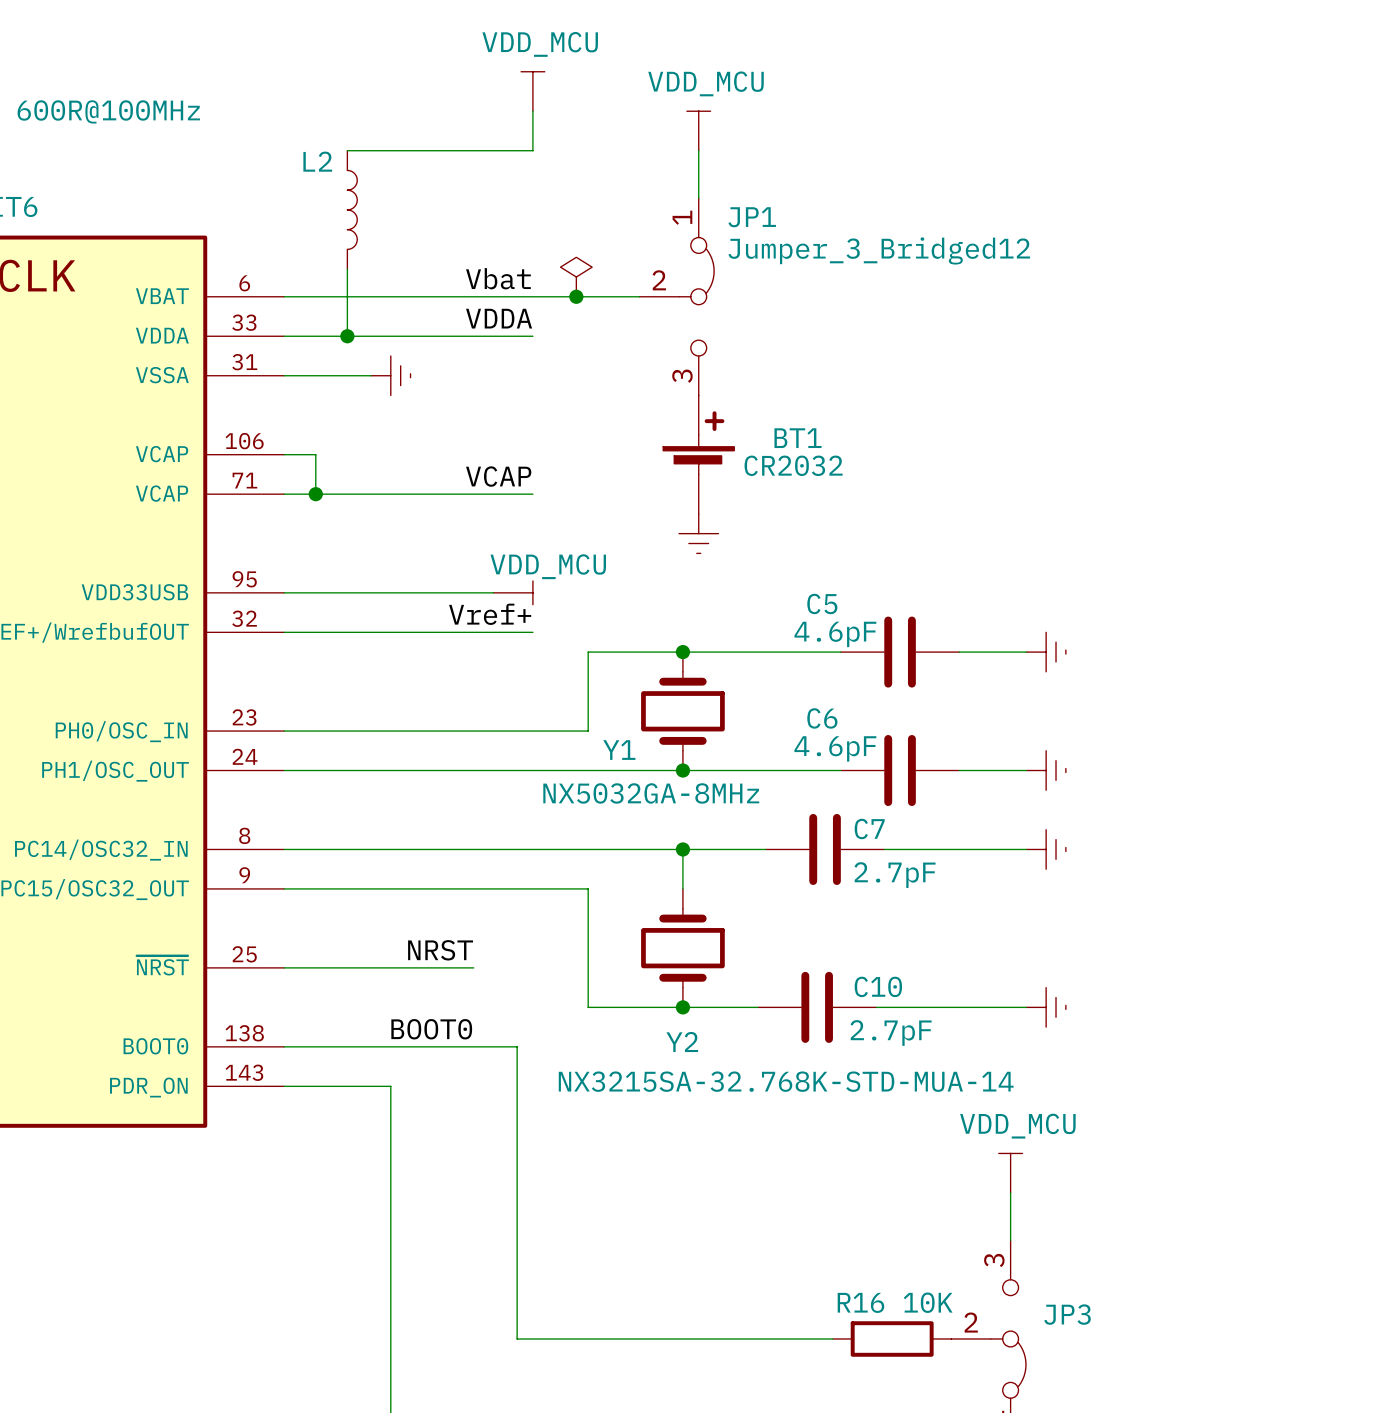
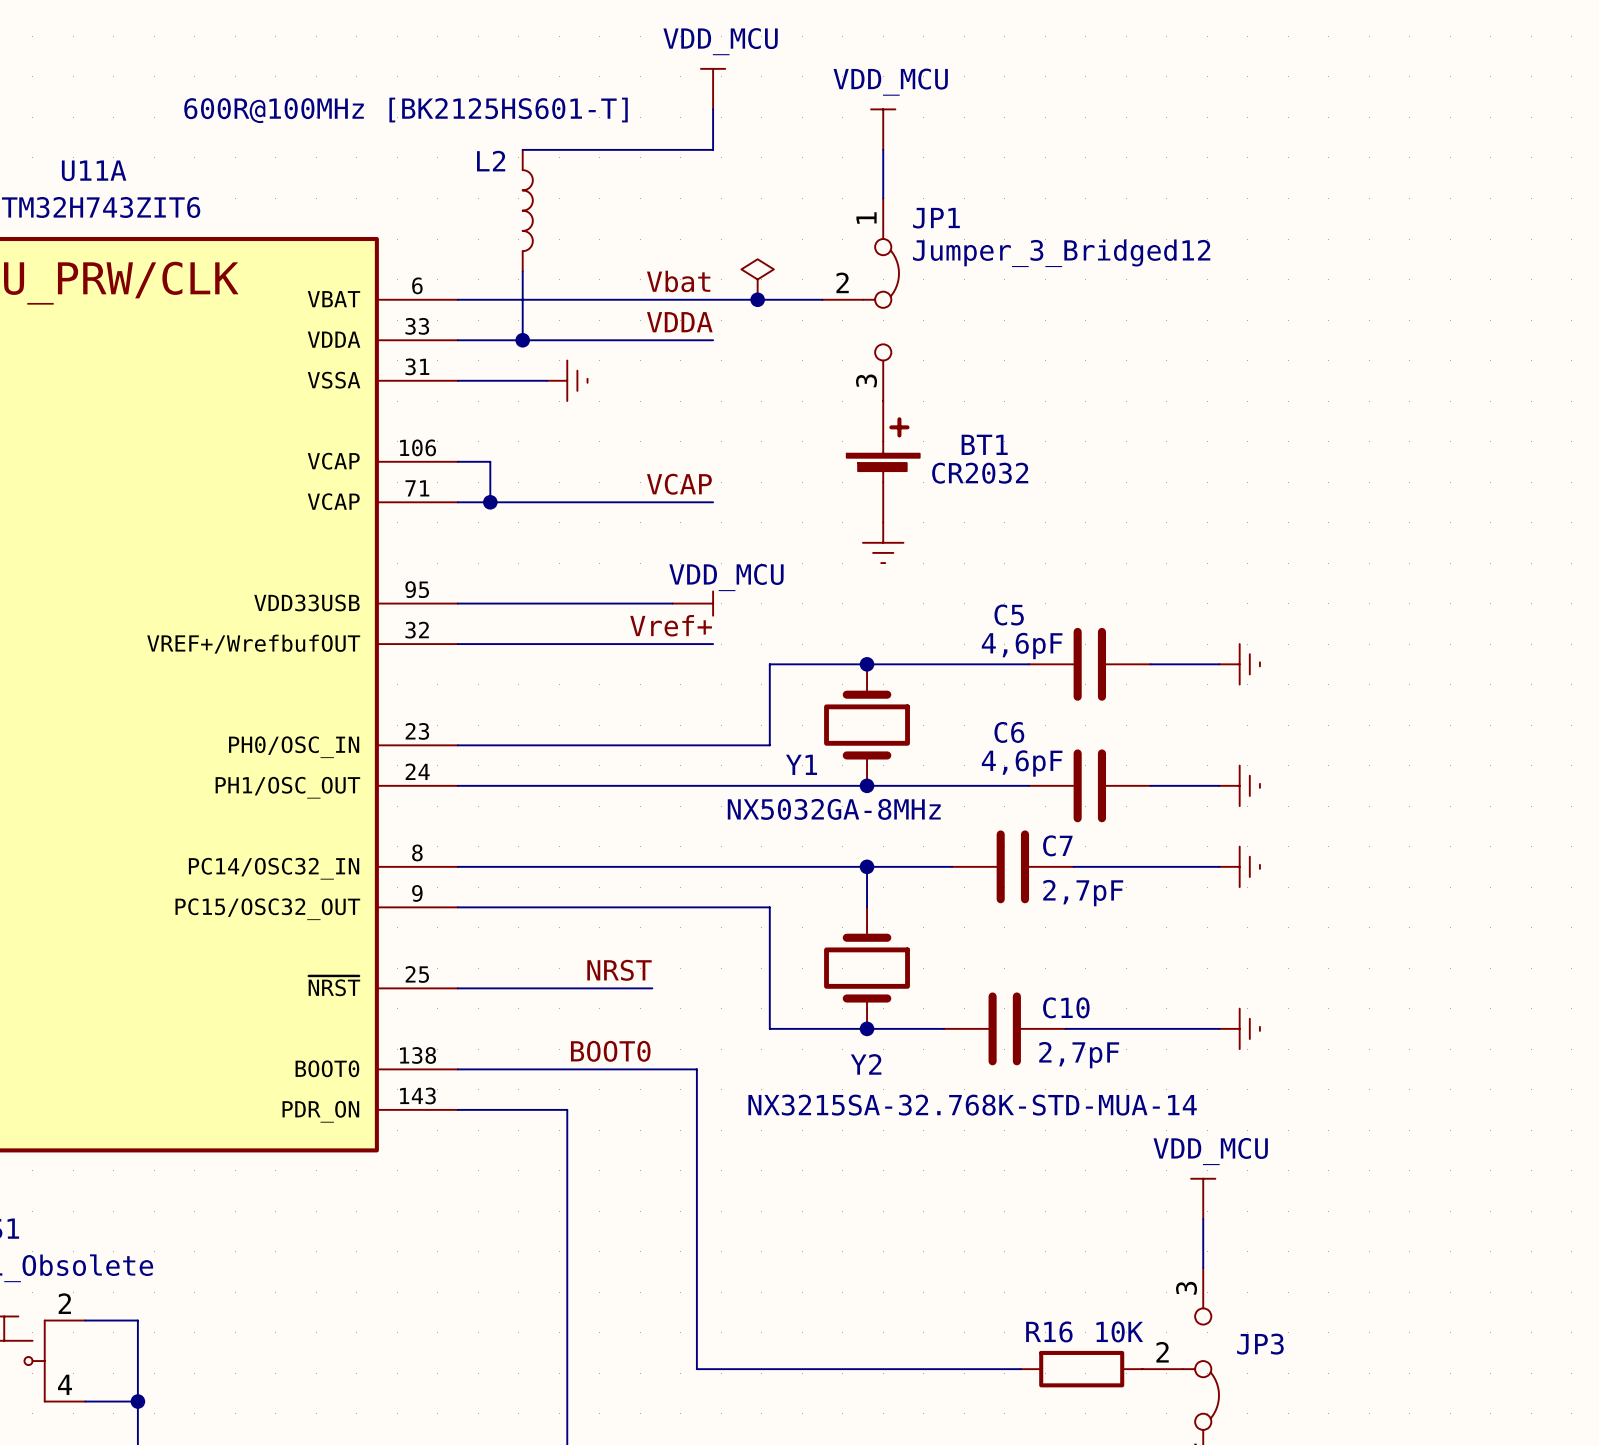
L2 value: 600R@100MHz (108, 111) -> 600R@100MHz [BK2125HS601-T] (406, 110)
C5 value: 4.6pF (835, 634) -> 4,6pF (1022, 646)
C6 value: 4.6pF (835, 748) -> 4,6pF (1022, 763)
C7 value: 2.7pF (895, 875) -> 2,7pF (1083, 893)
C10 value: 2.7pF (891, 1032) -> 2,7pF (1079, 1055)

